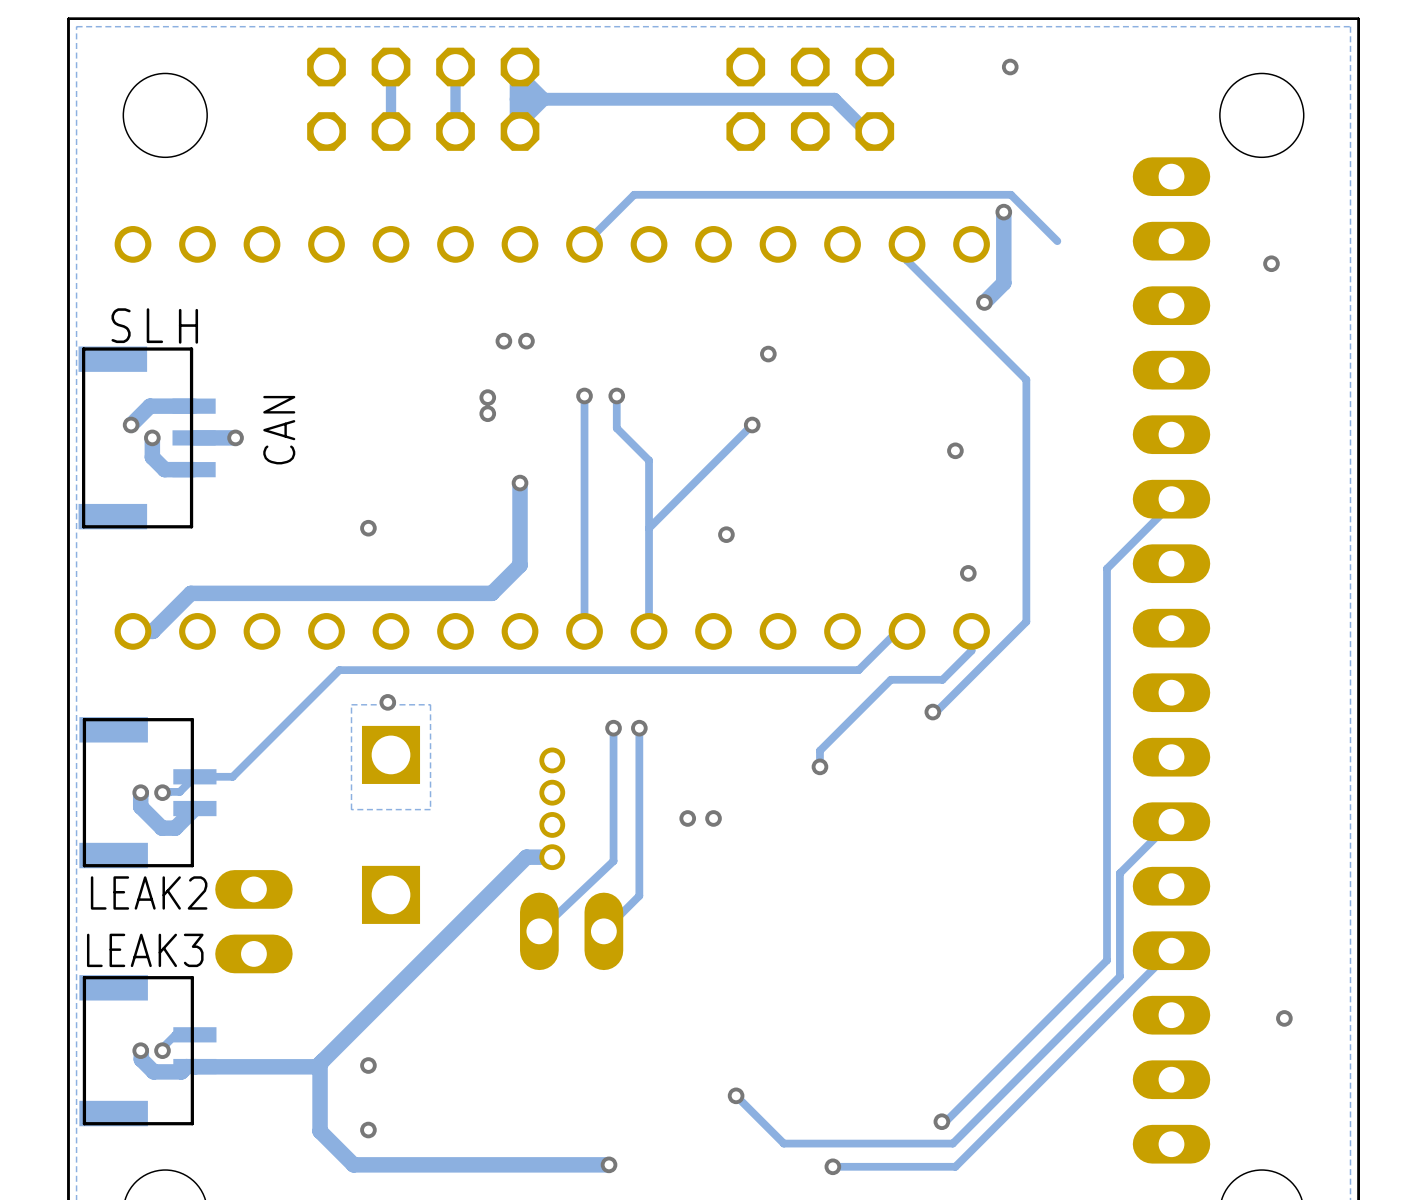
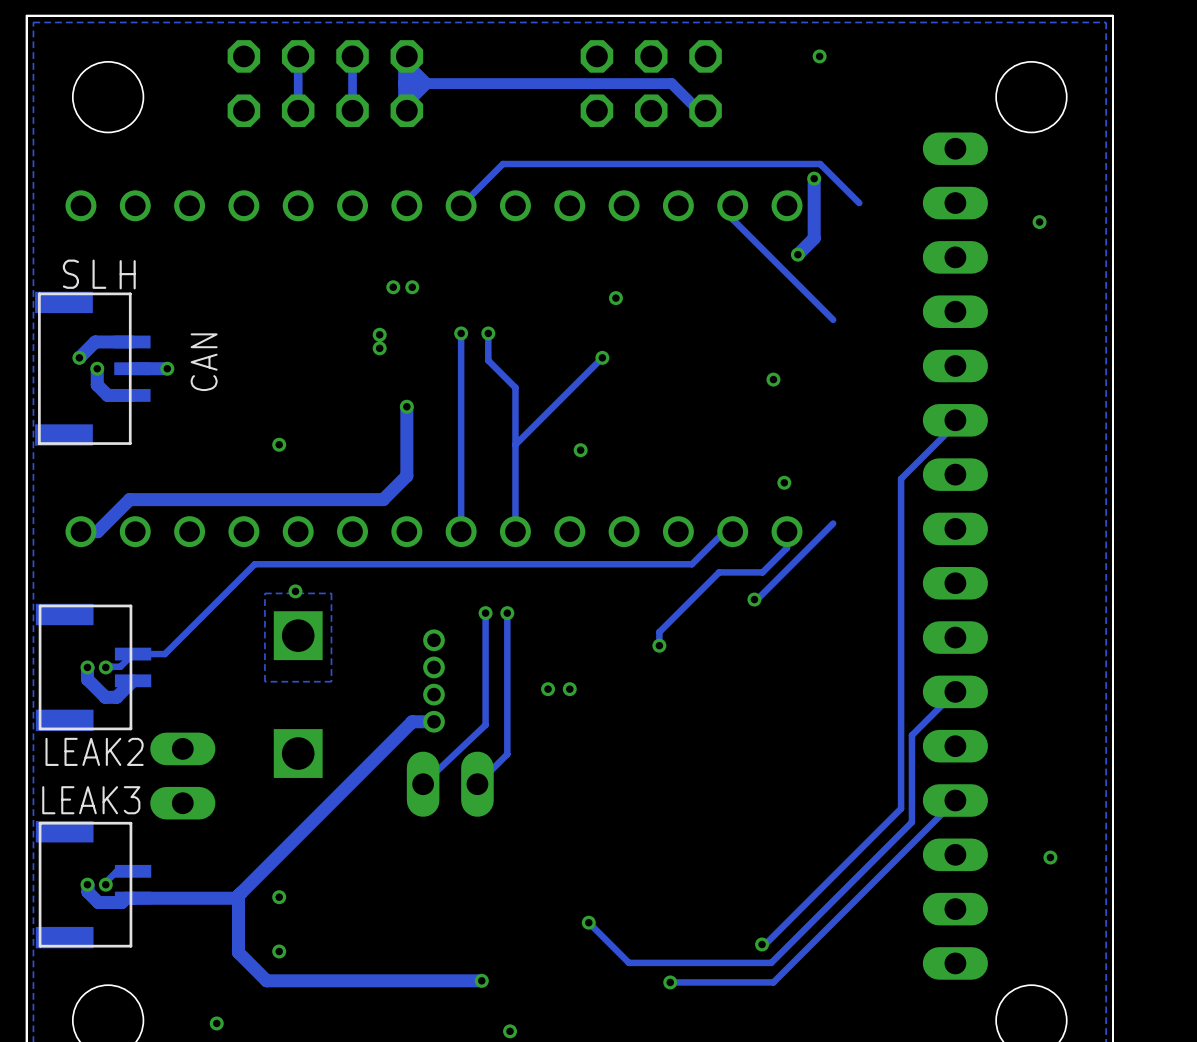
track: (1026, 379) (1026, 621) -> none

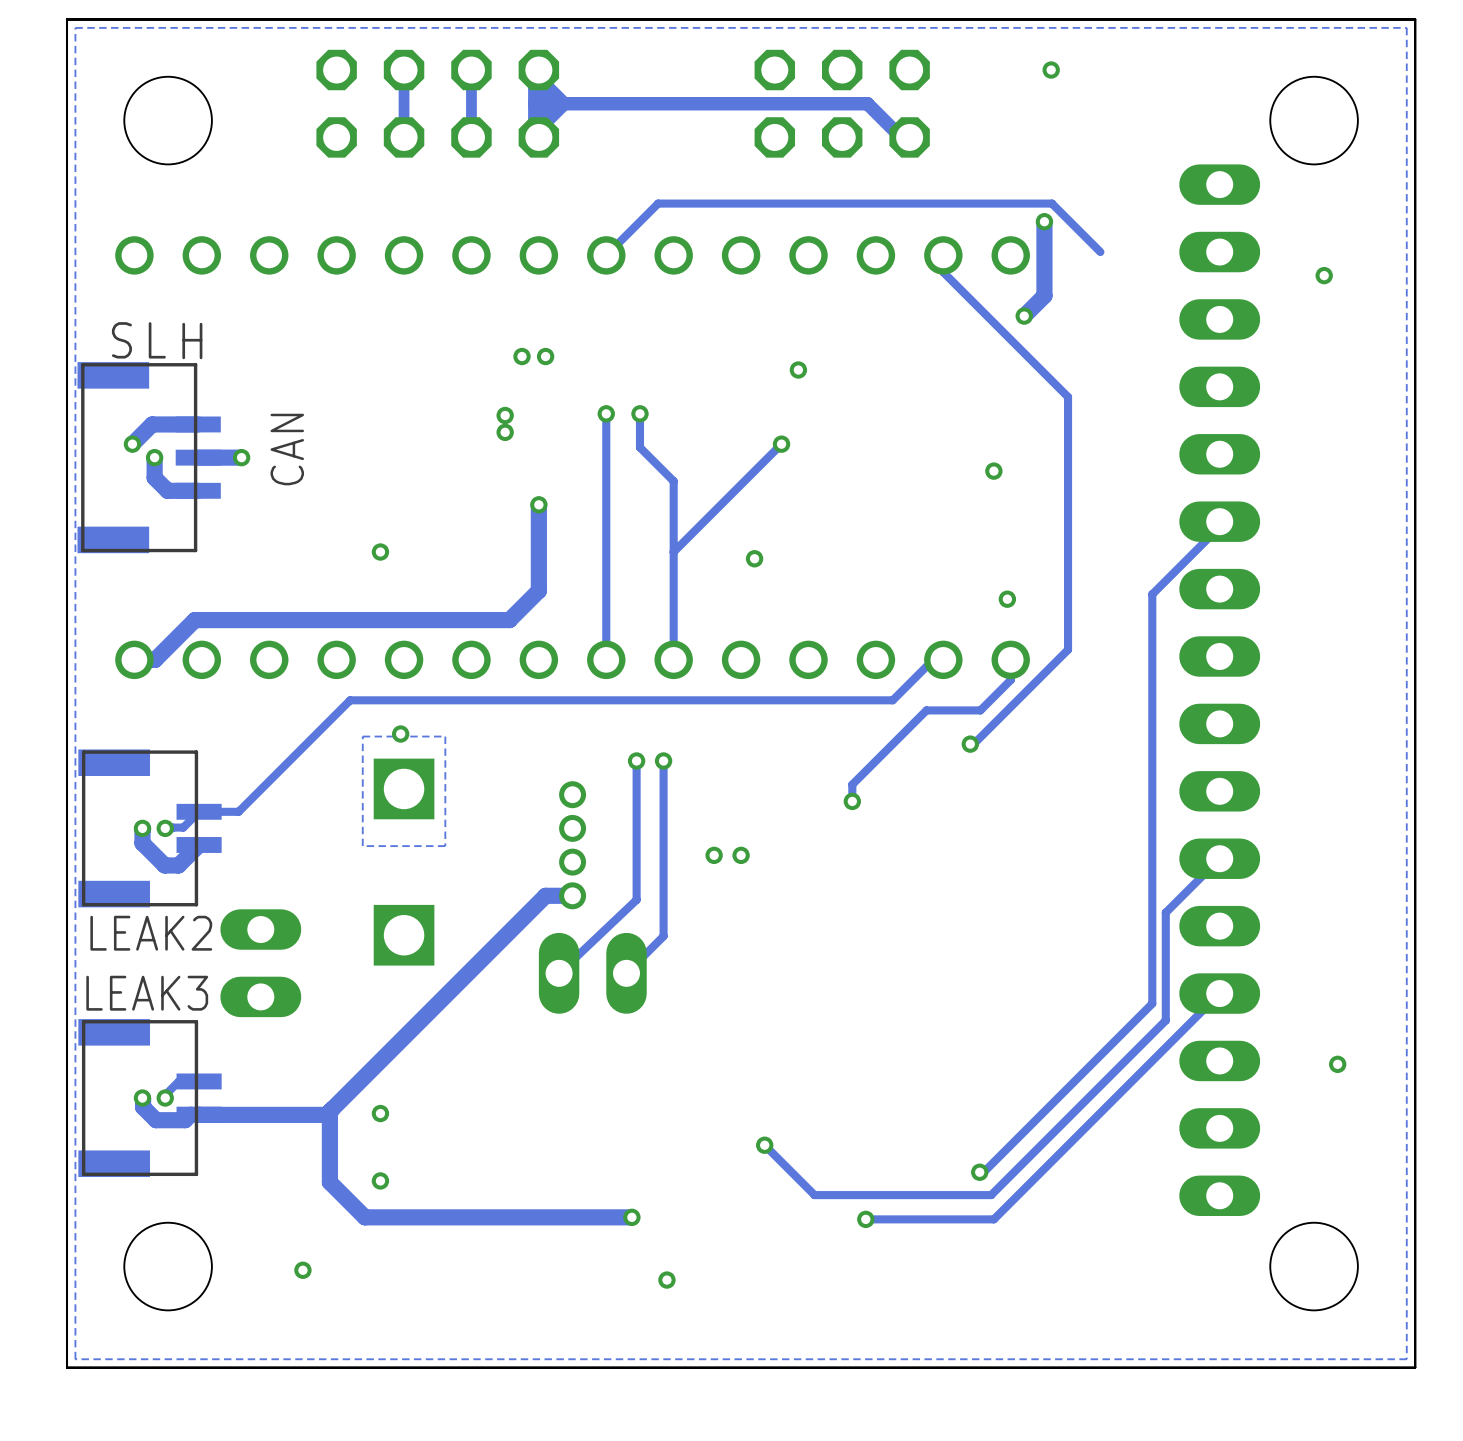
track: none -> (1068, 396) (1068, 649)

